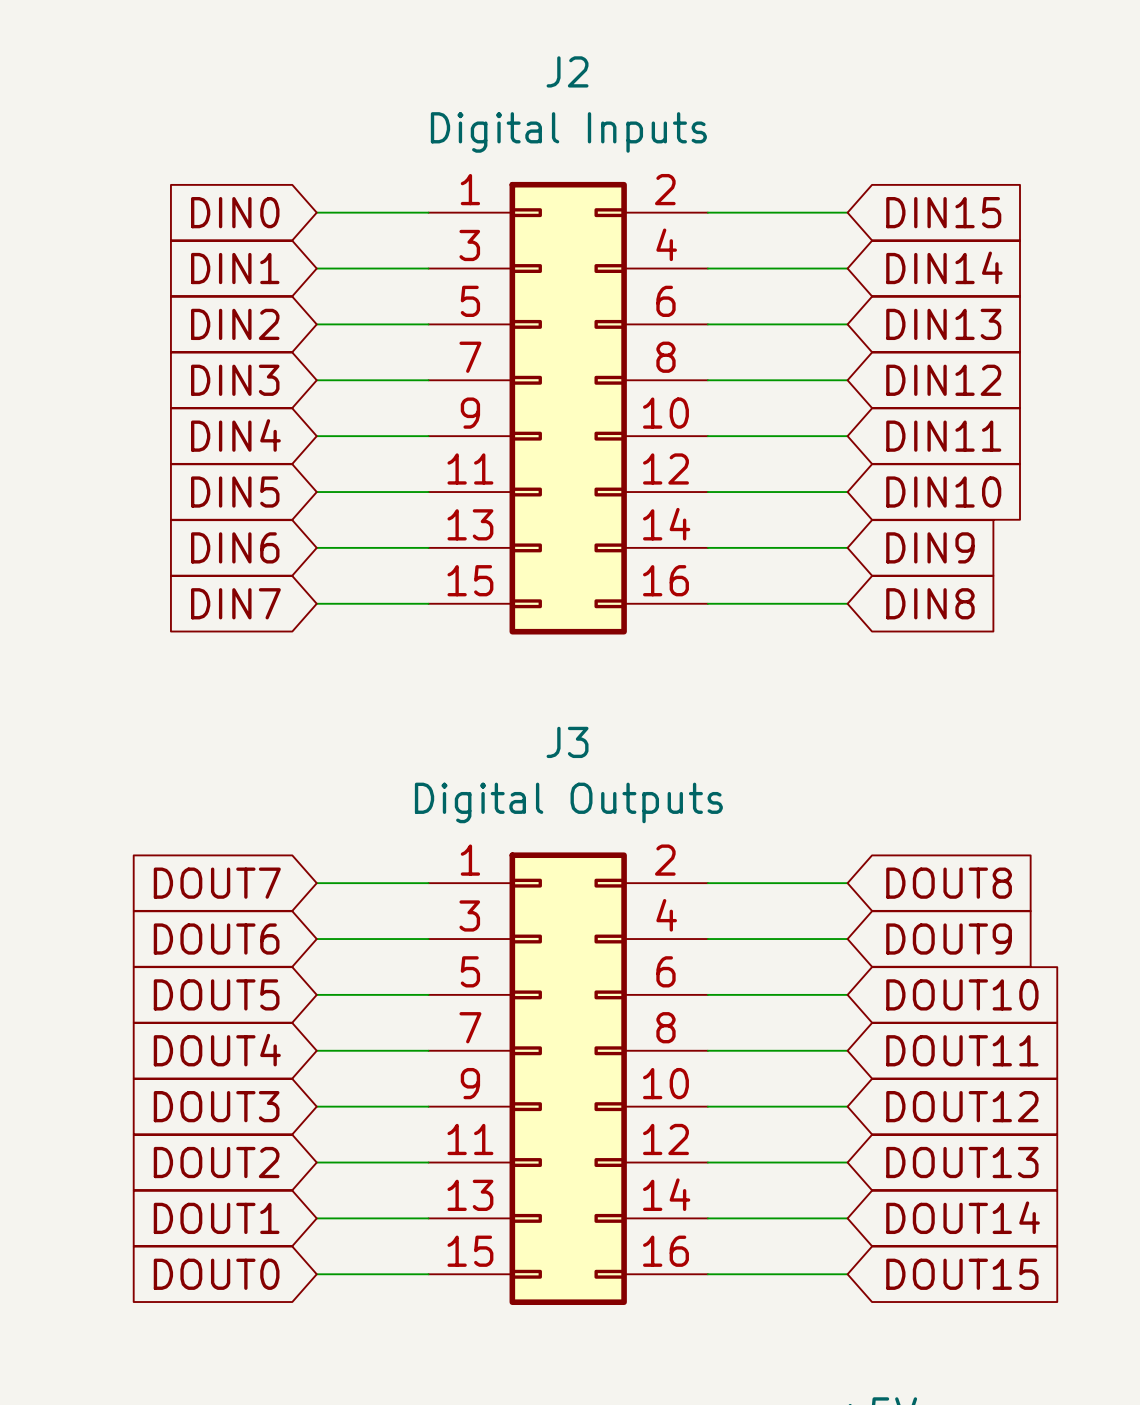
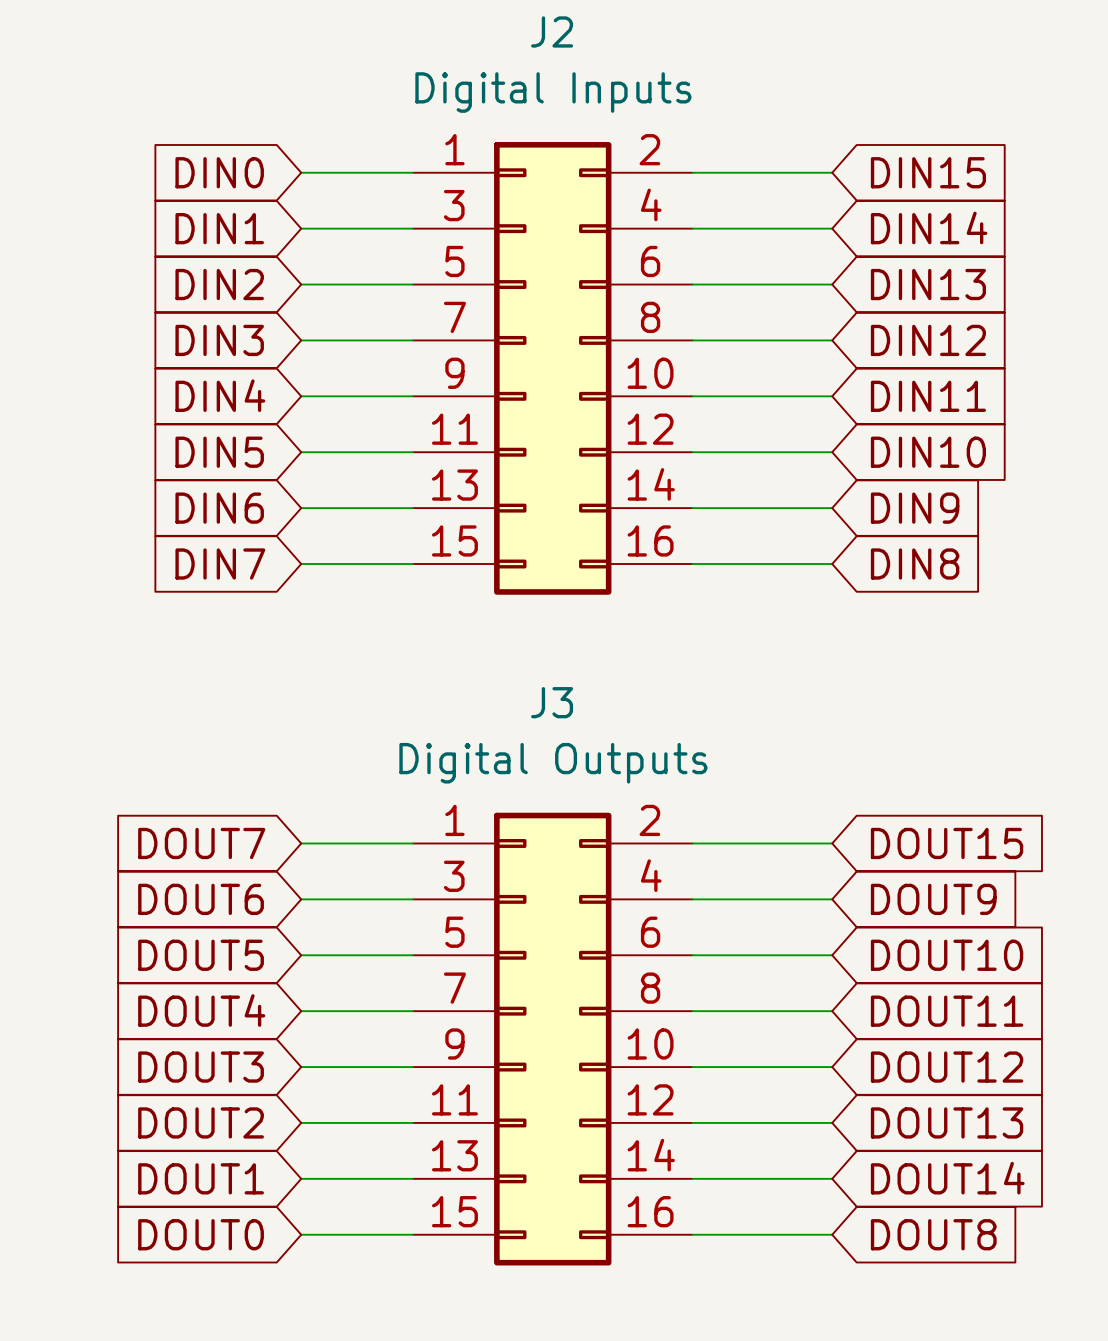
global label: DOUT8 (949, 883) -> DOUT15 (947, 843)
global label: DOUT15 (962, 1274) -> DOUT8 (933, 1234)

